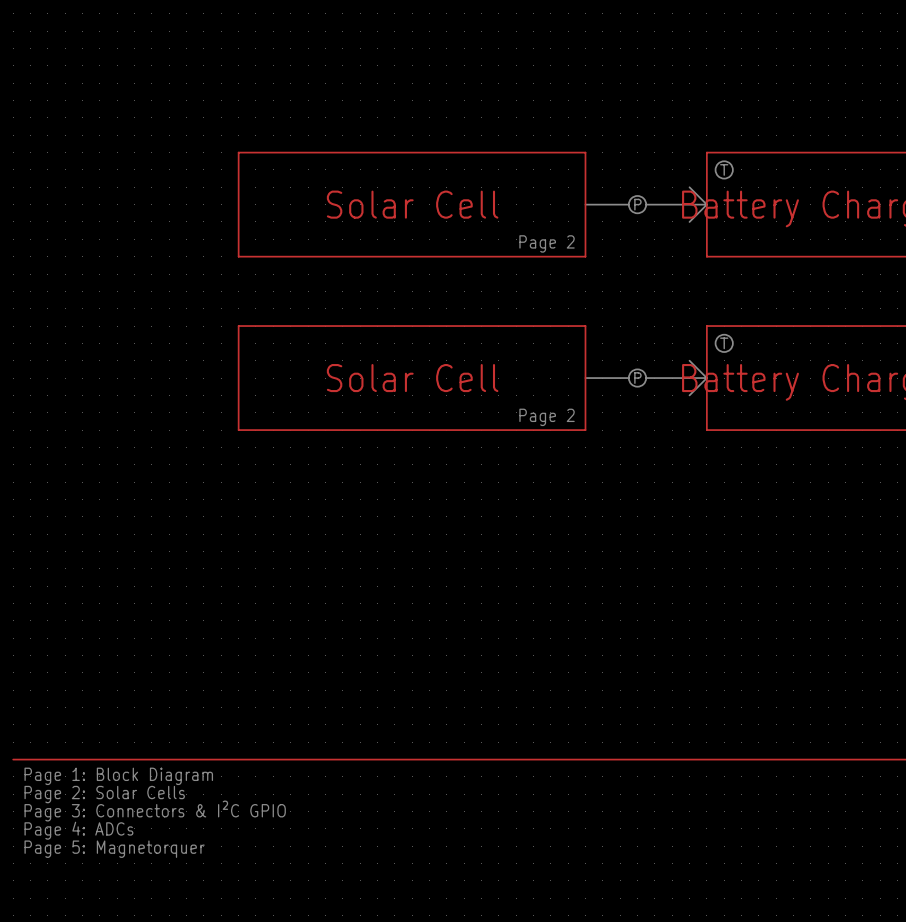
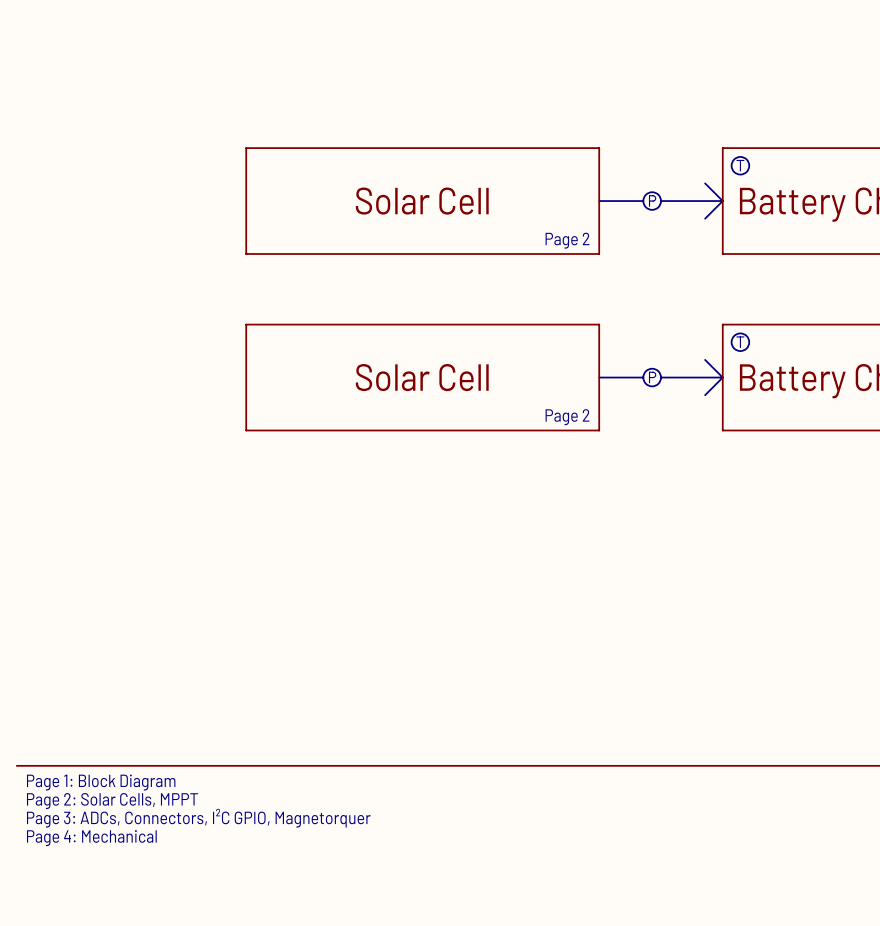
text: Page 2: Solar Cells (104, 794) -> Page 2: Solar Cells, MPPT (112, 801)
text: Page 3: Connectors & I²C GPIO (155, 811) -> Page 3: ADCs, Connectors, I²C GPIO, Magnetorquer (198, 818)
text: Page 4: ADCs (78, 830) -> Page 4: Mechanical (91, 838)
text: Page 5: Magnetorquer (114, 849) -> none

